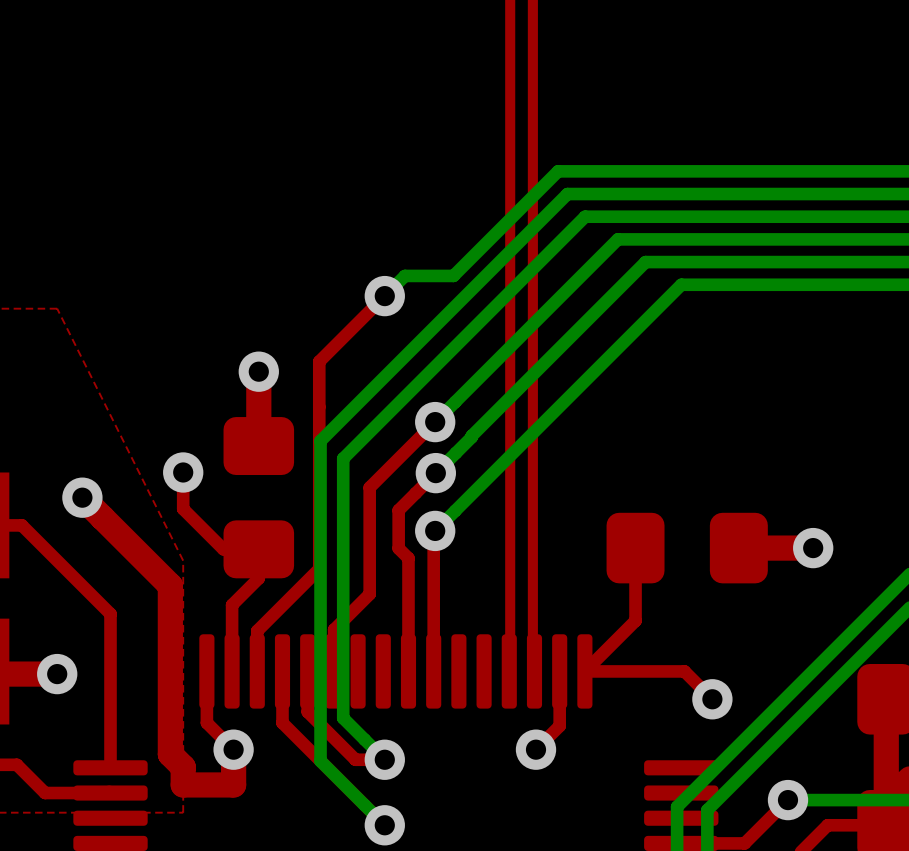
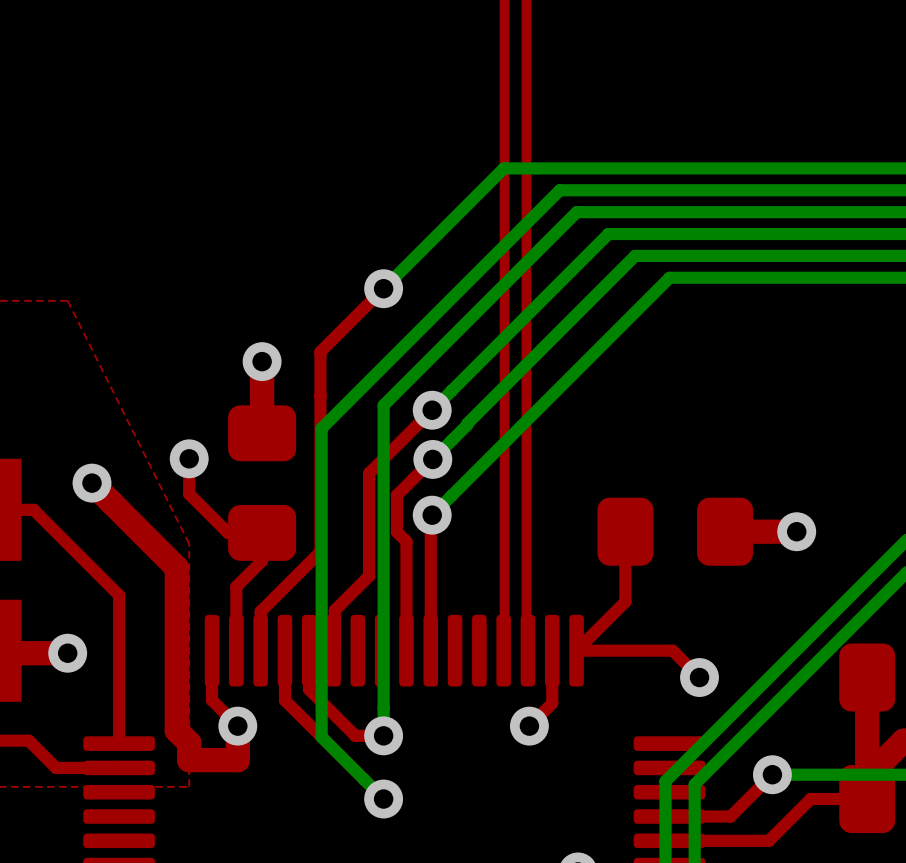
bottom track: (558, 171) (453, 275) (404, 275) -> (550, 168) (503, 168) (403, 269)
bottom track: (384, 417) (343, 458) (343, 718) (384, 759) -> (383, 405) (383, 735)

